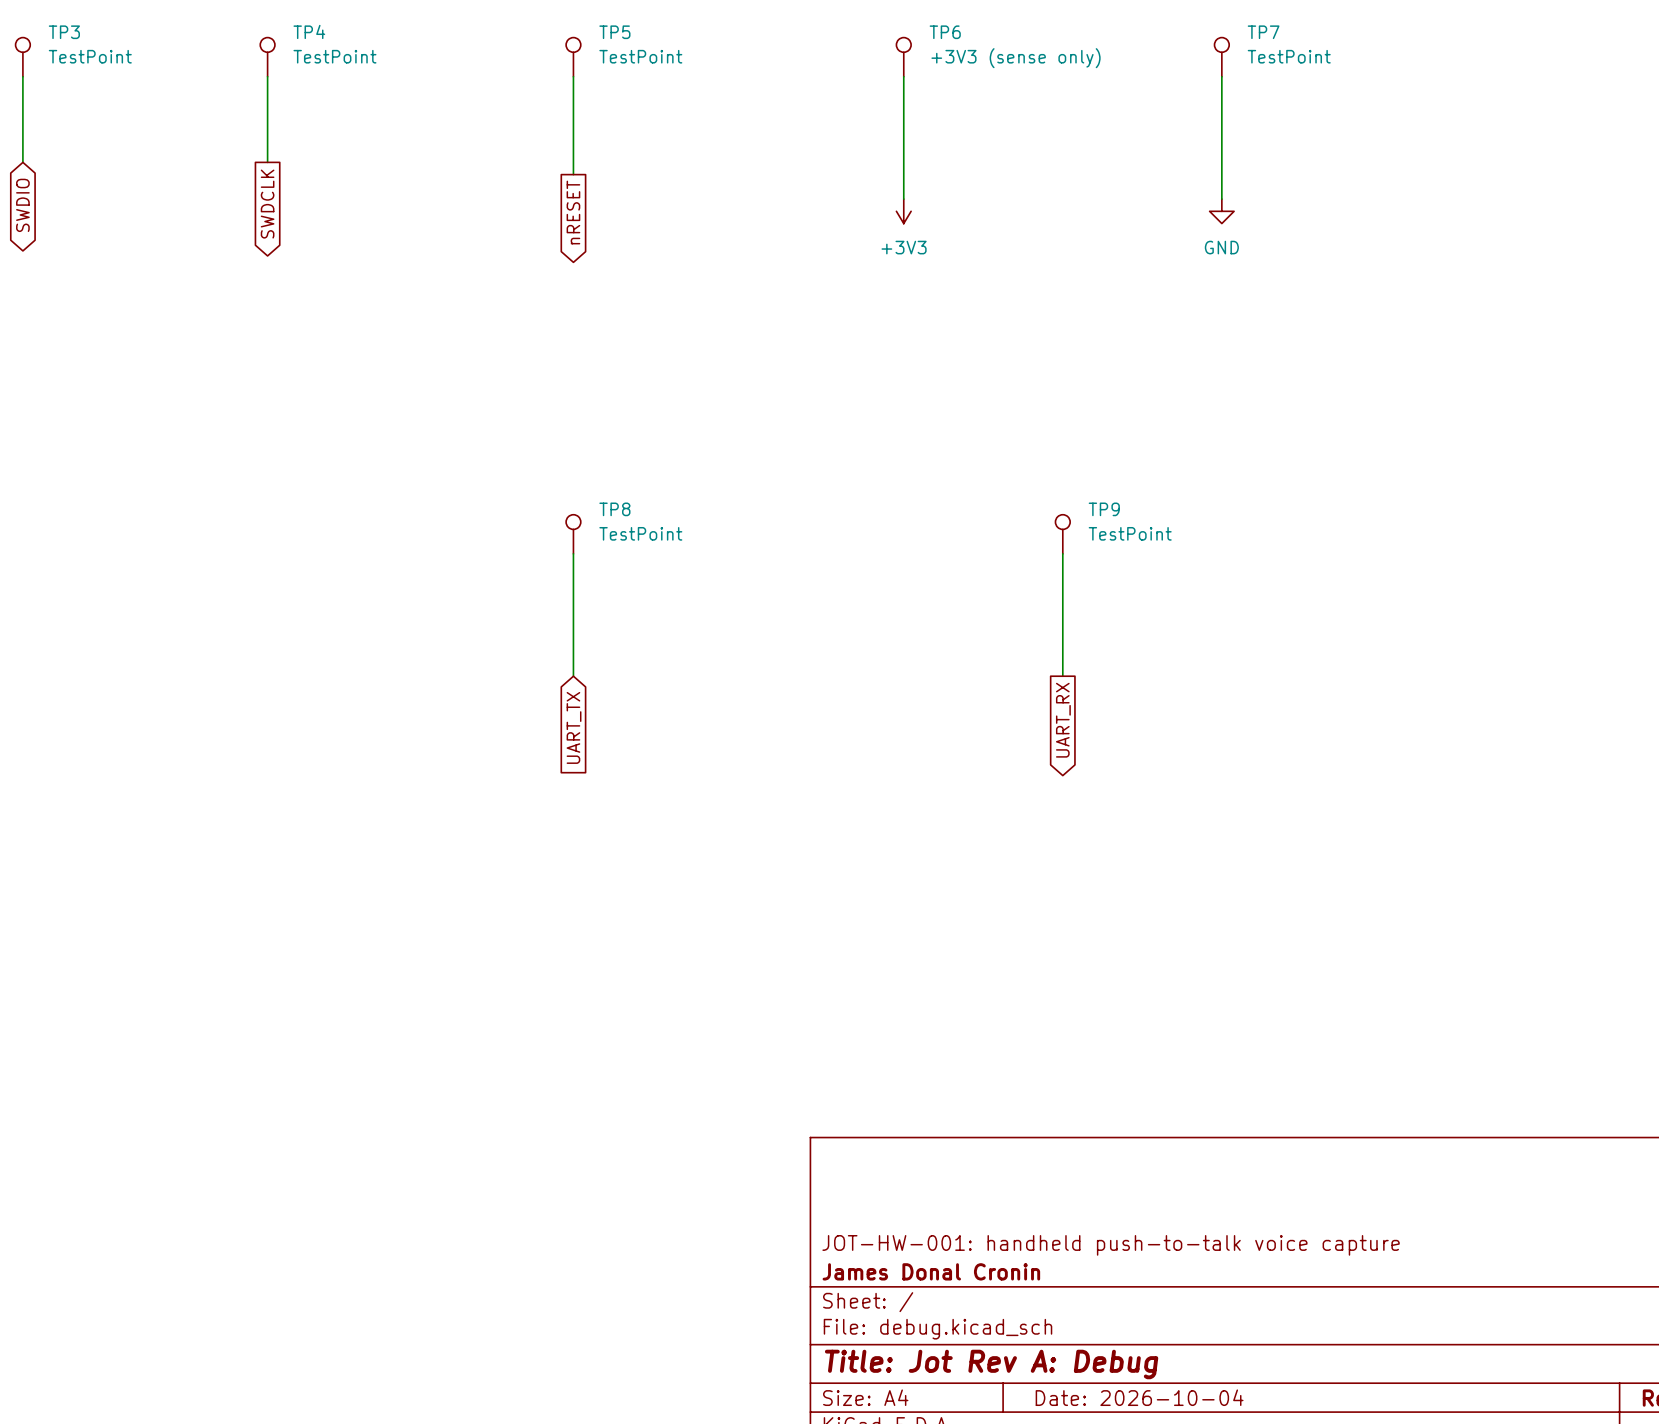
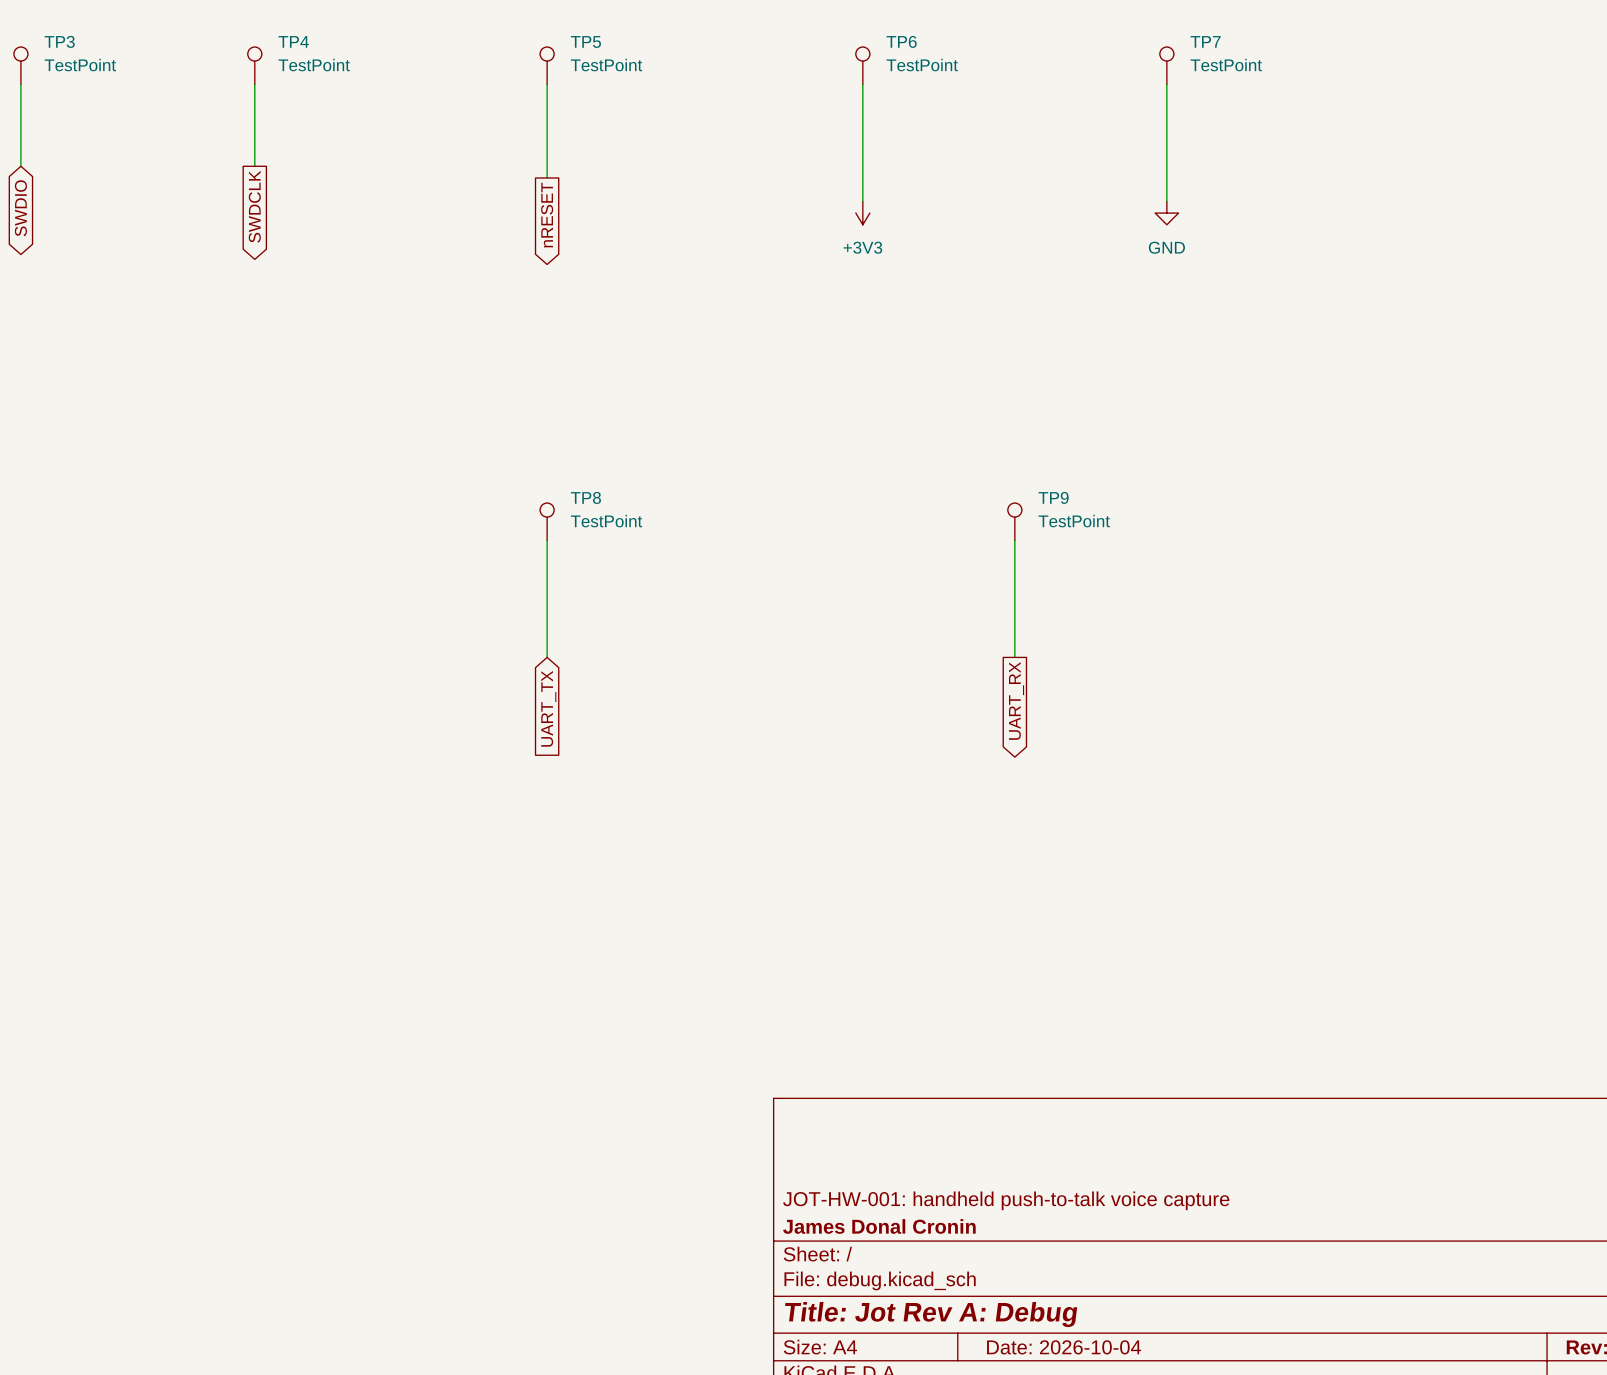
TP6 value: +3V3 (sense only) (1016, 58) -> TestPoint (922, 65)

